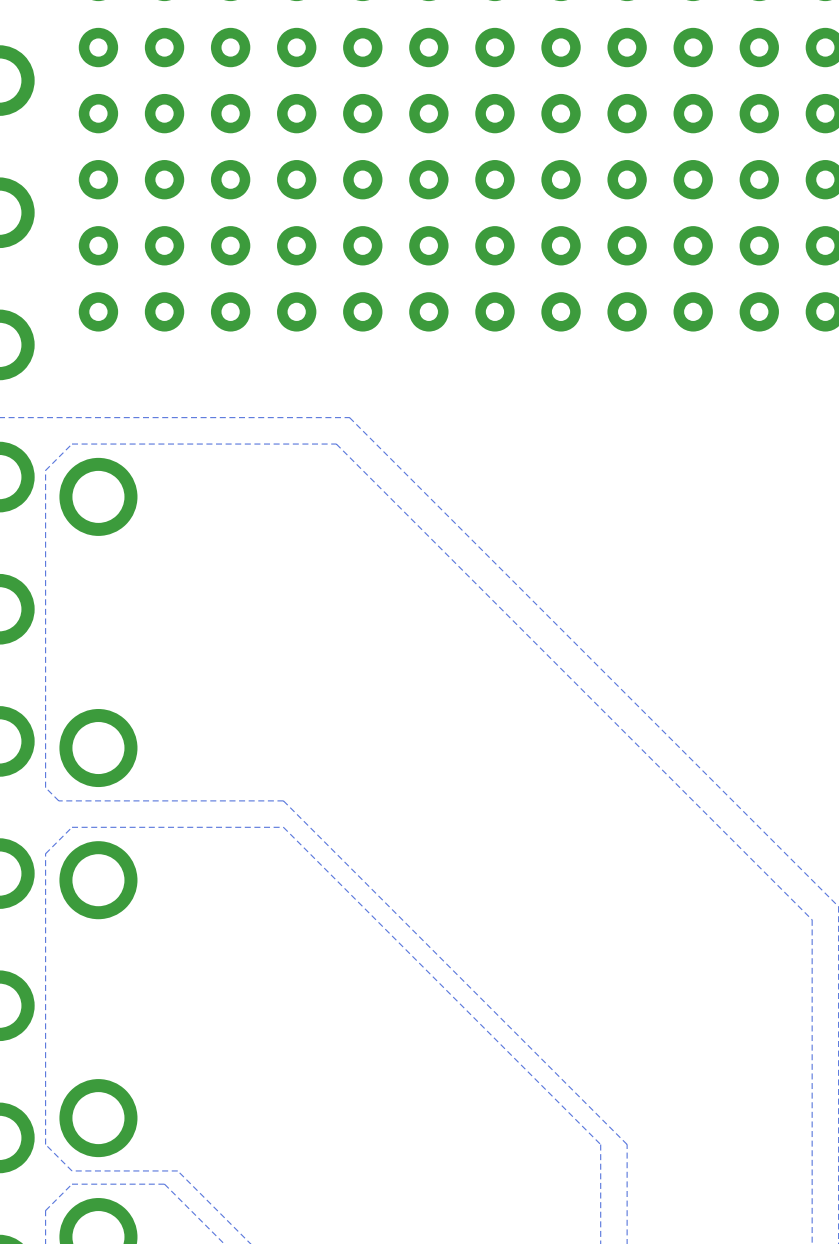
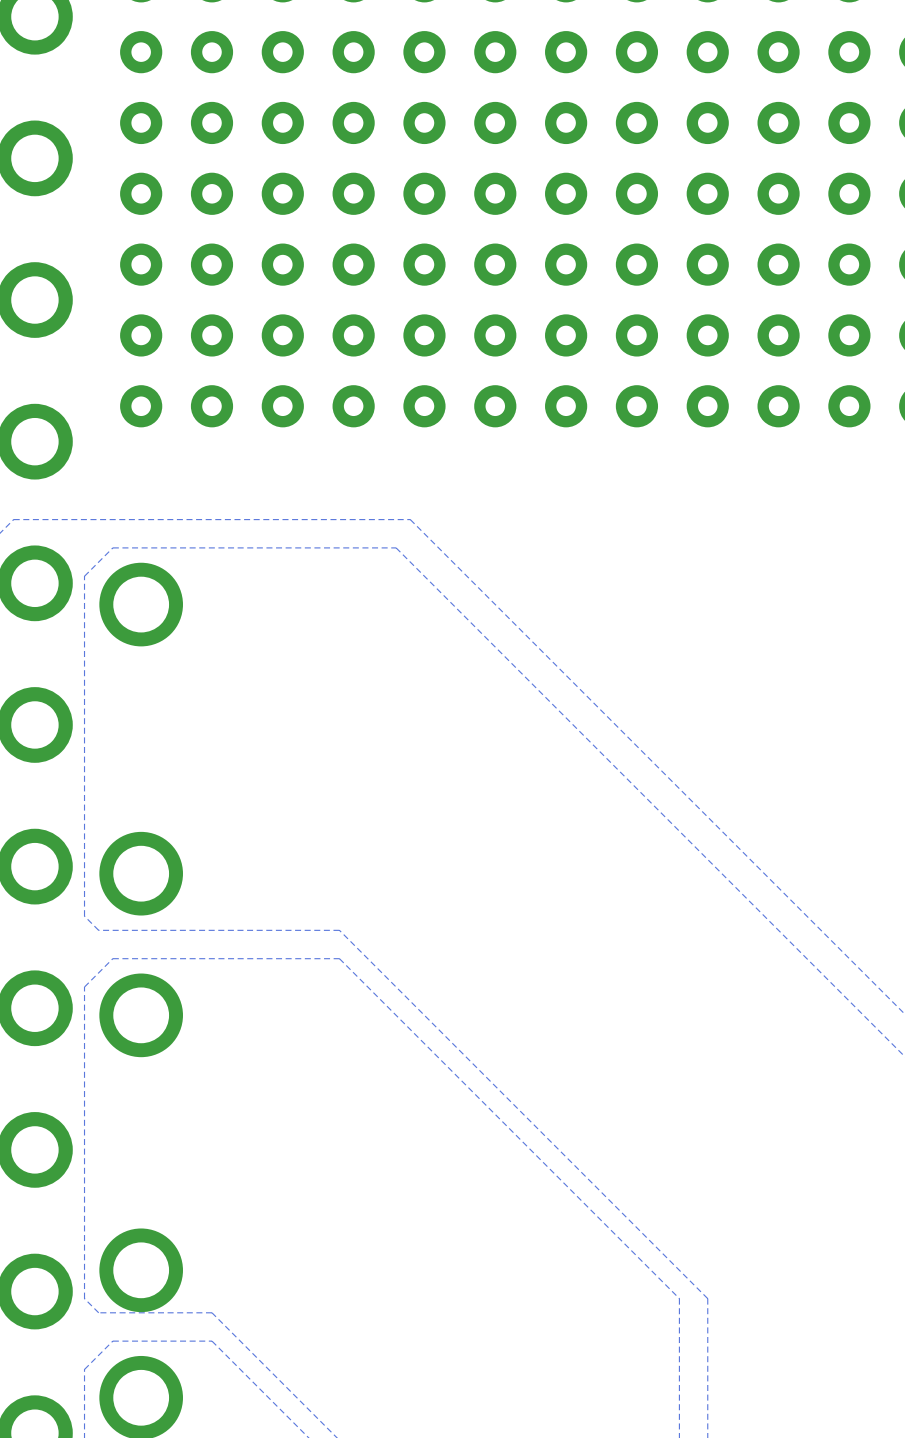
zone outline: (58, 1157) (72, 1170) (177, 1170) -> (98, 1312) (211, 1312) (226, 1326)

